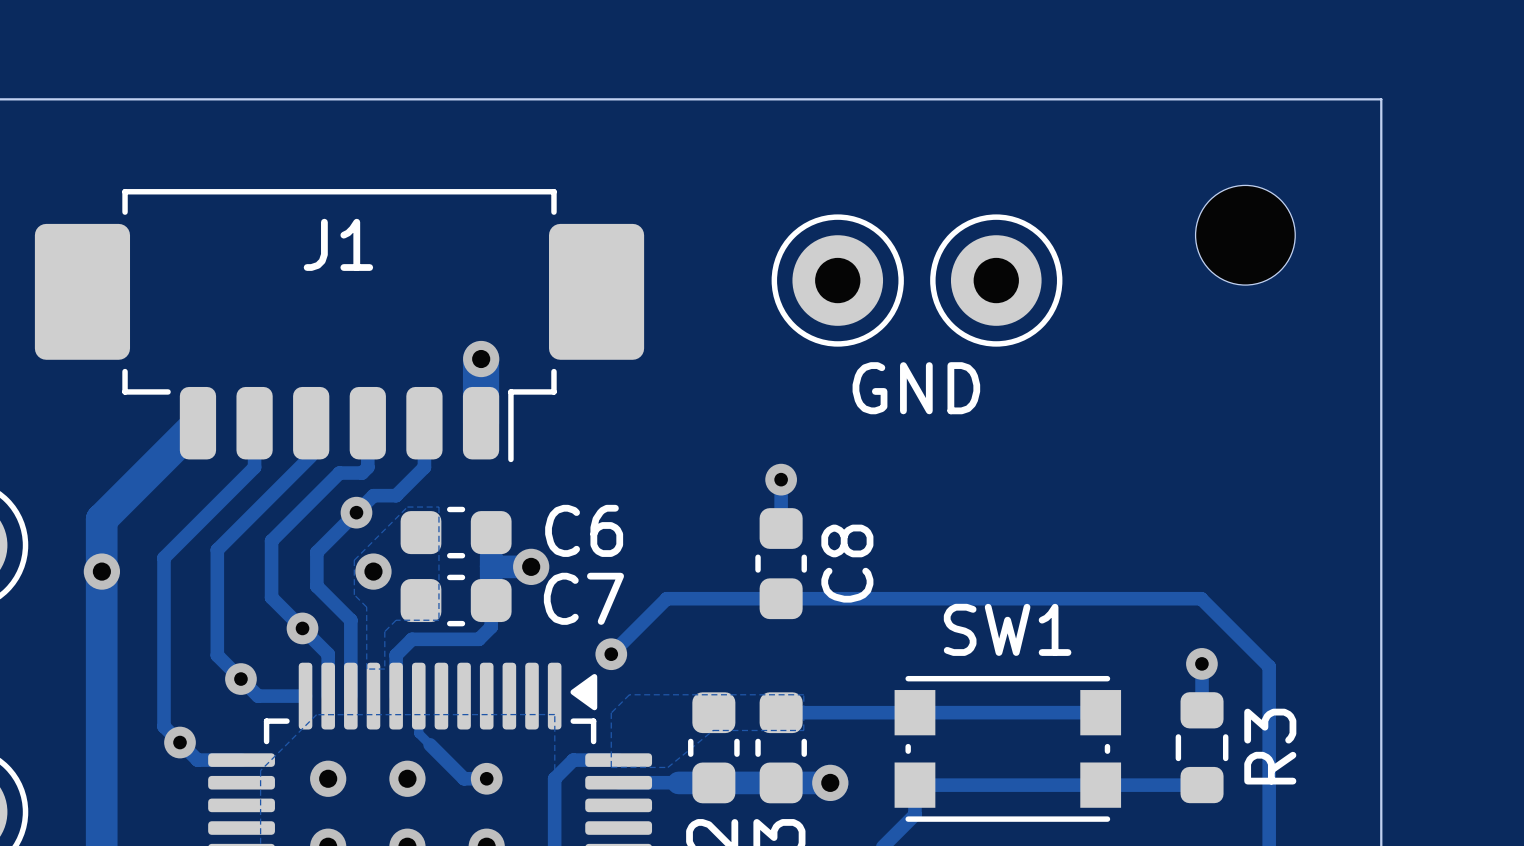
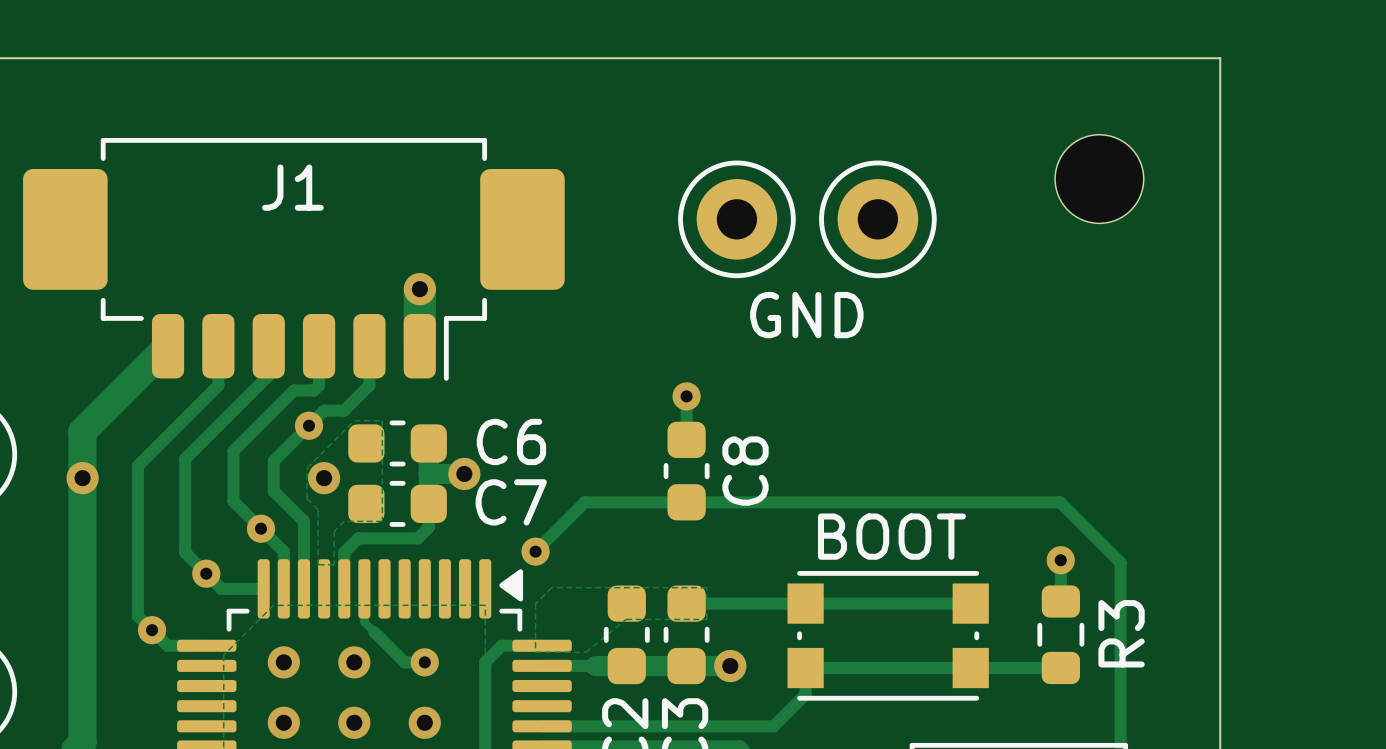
SW1 name: SW1 (1007, 629) -> none
text: none -> BOOT (891, 536)

